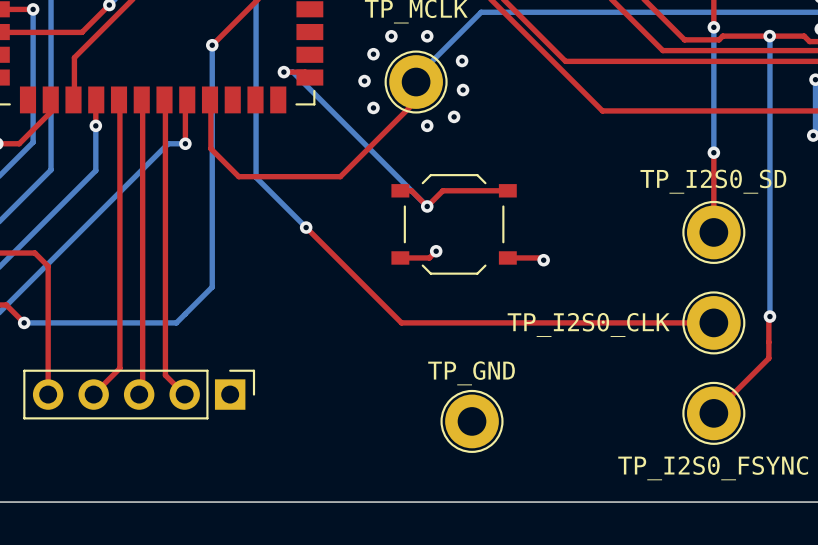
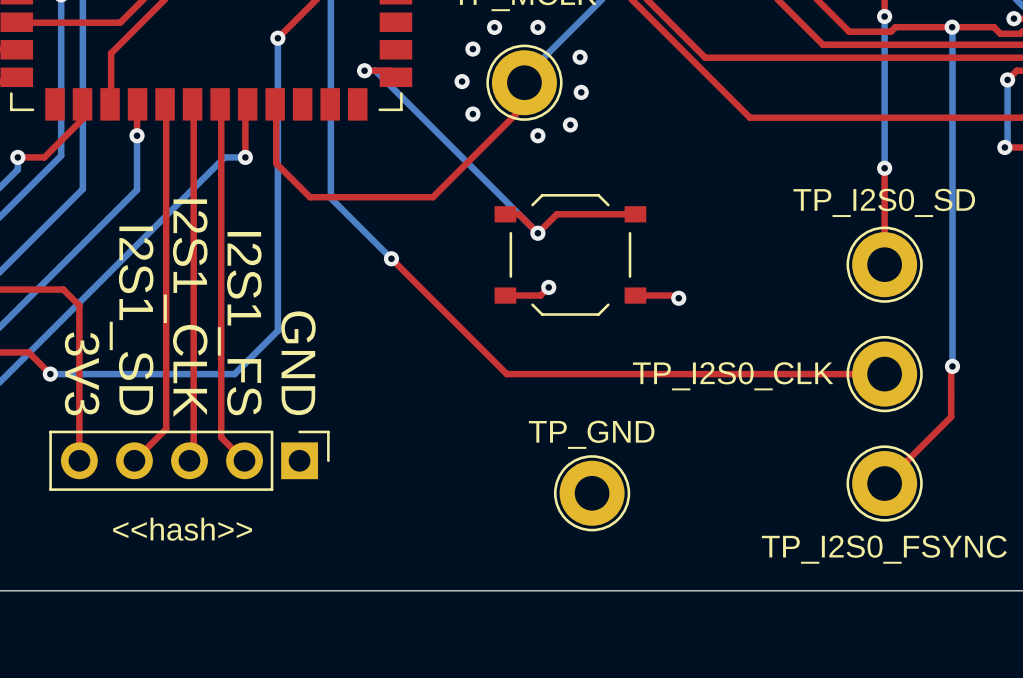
text: none -> I2S1_CLK (185, 308)
text: none -> I2S1_SD (131, 320)
text: none -> I2S1_FS (239, 323)
text: none -> 3V3 (82, 373)
text: none -> GND (298, 363)
text: none -> <<hash>> (182, 529)

